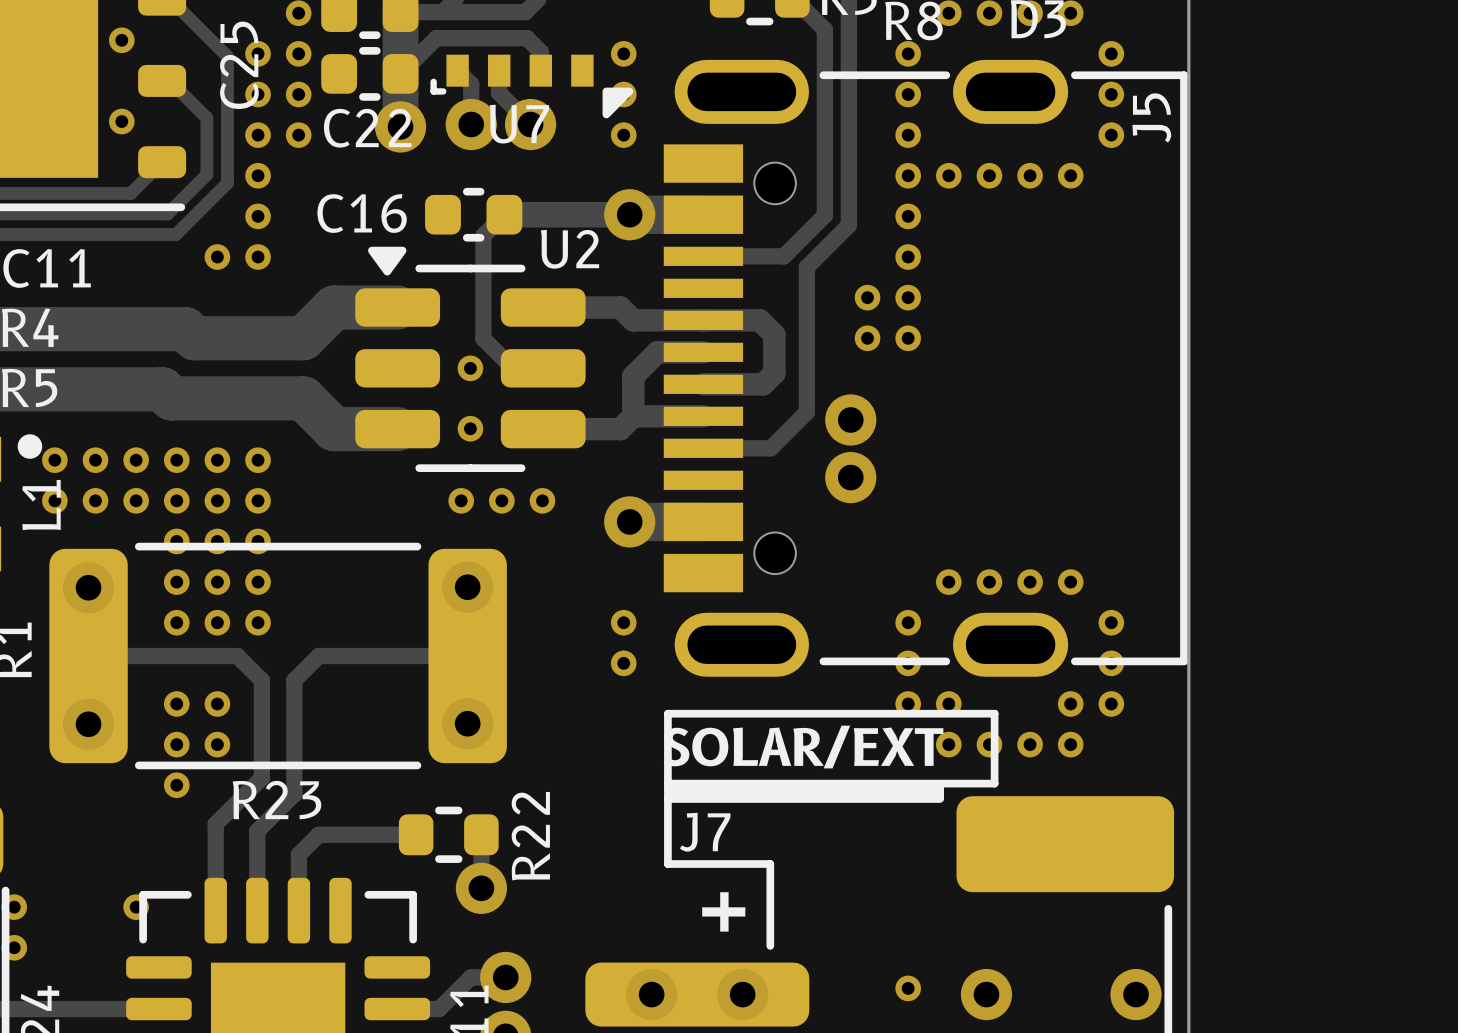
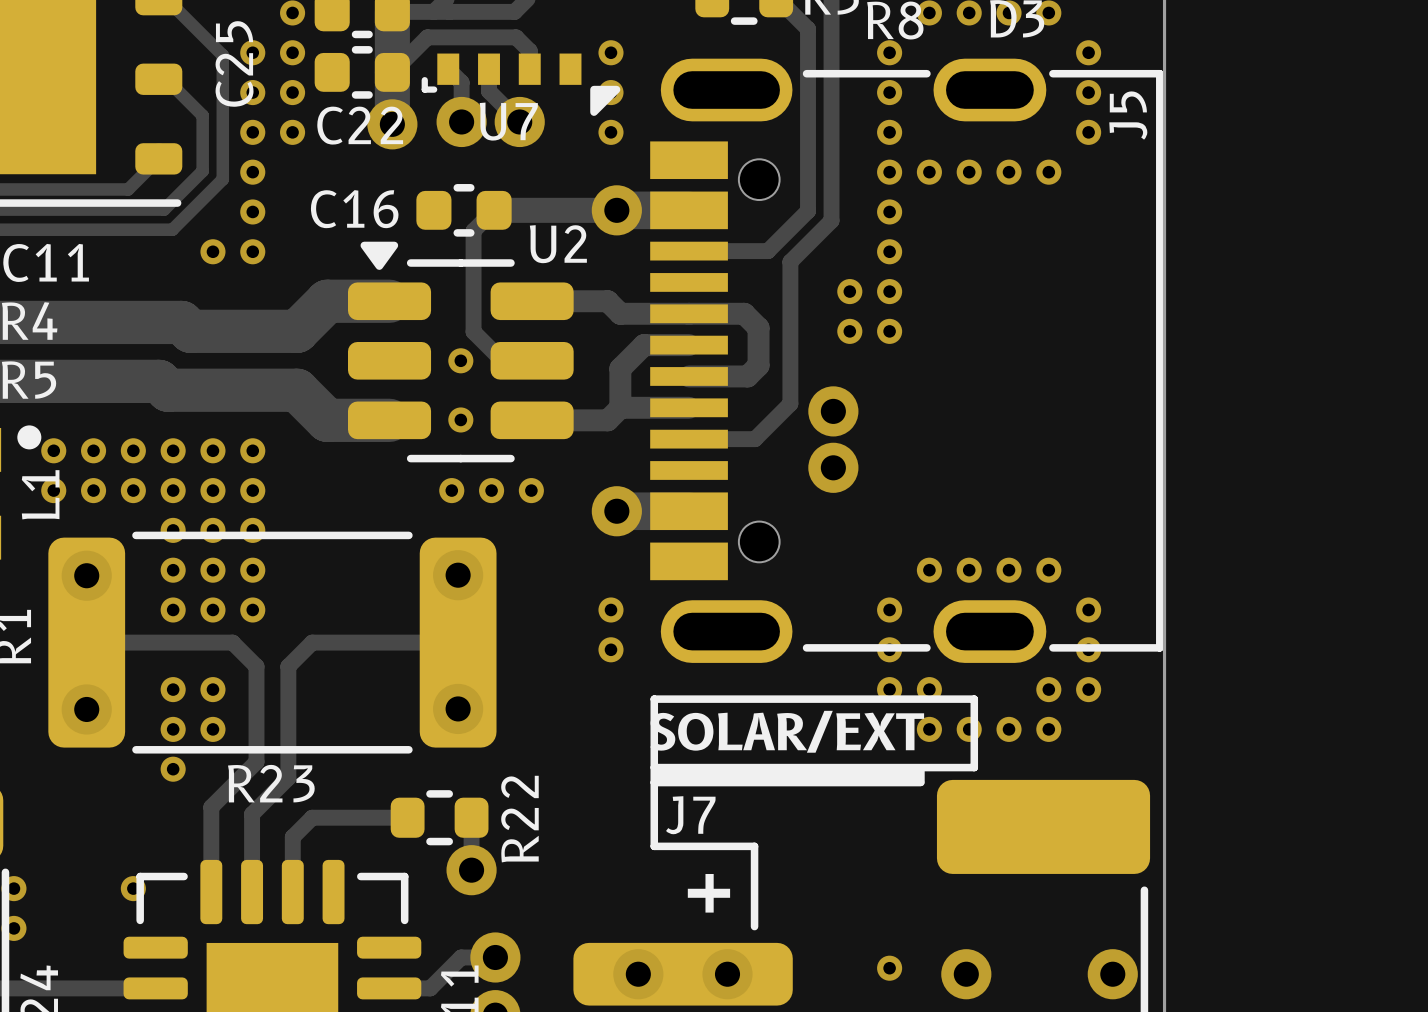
via: (121, 40) -> none
via: (121, 121) -> none

